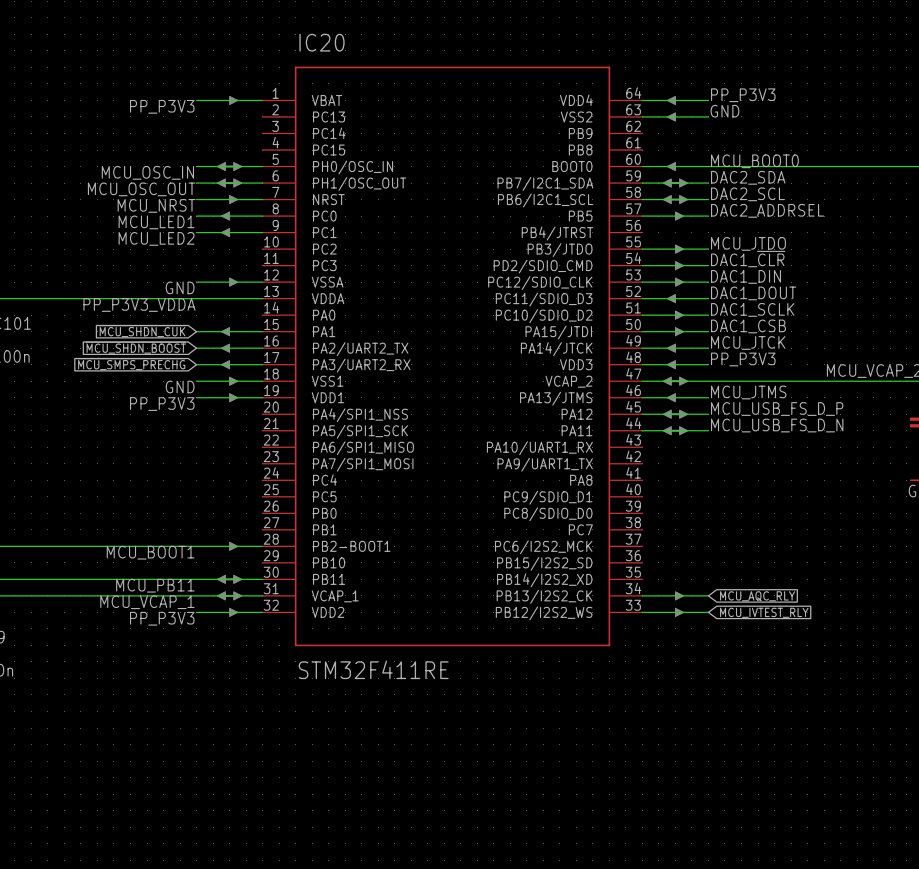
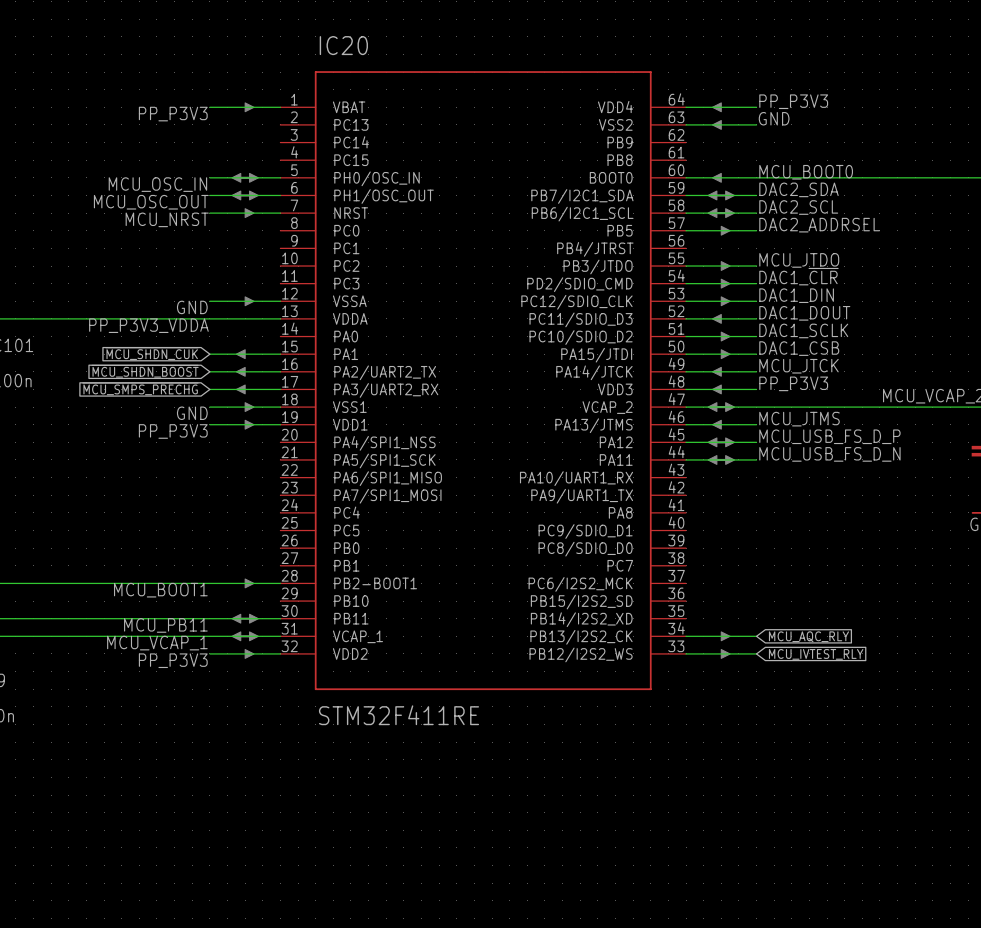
wire: (196, 216) (262, 216) -> none
part: (225, 216) -> none
label: MCU_LED1 (156, 222) -> none
wire: (196, 232) (262, 232) -> none
part: (225, 232) -> none
label: MCU_LED2 (156, 238) -> none

